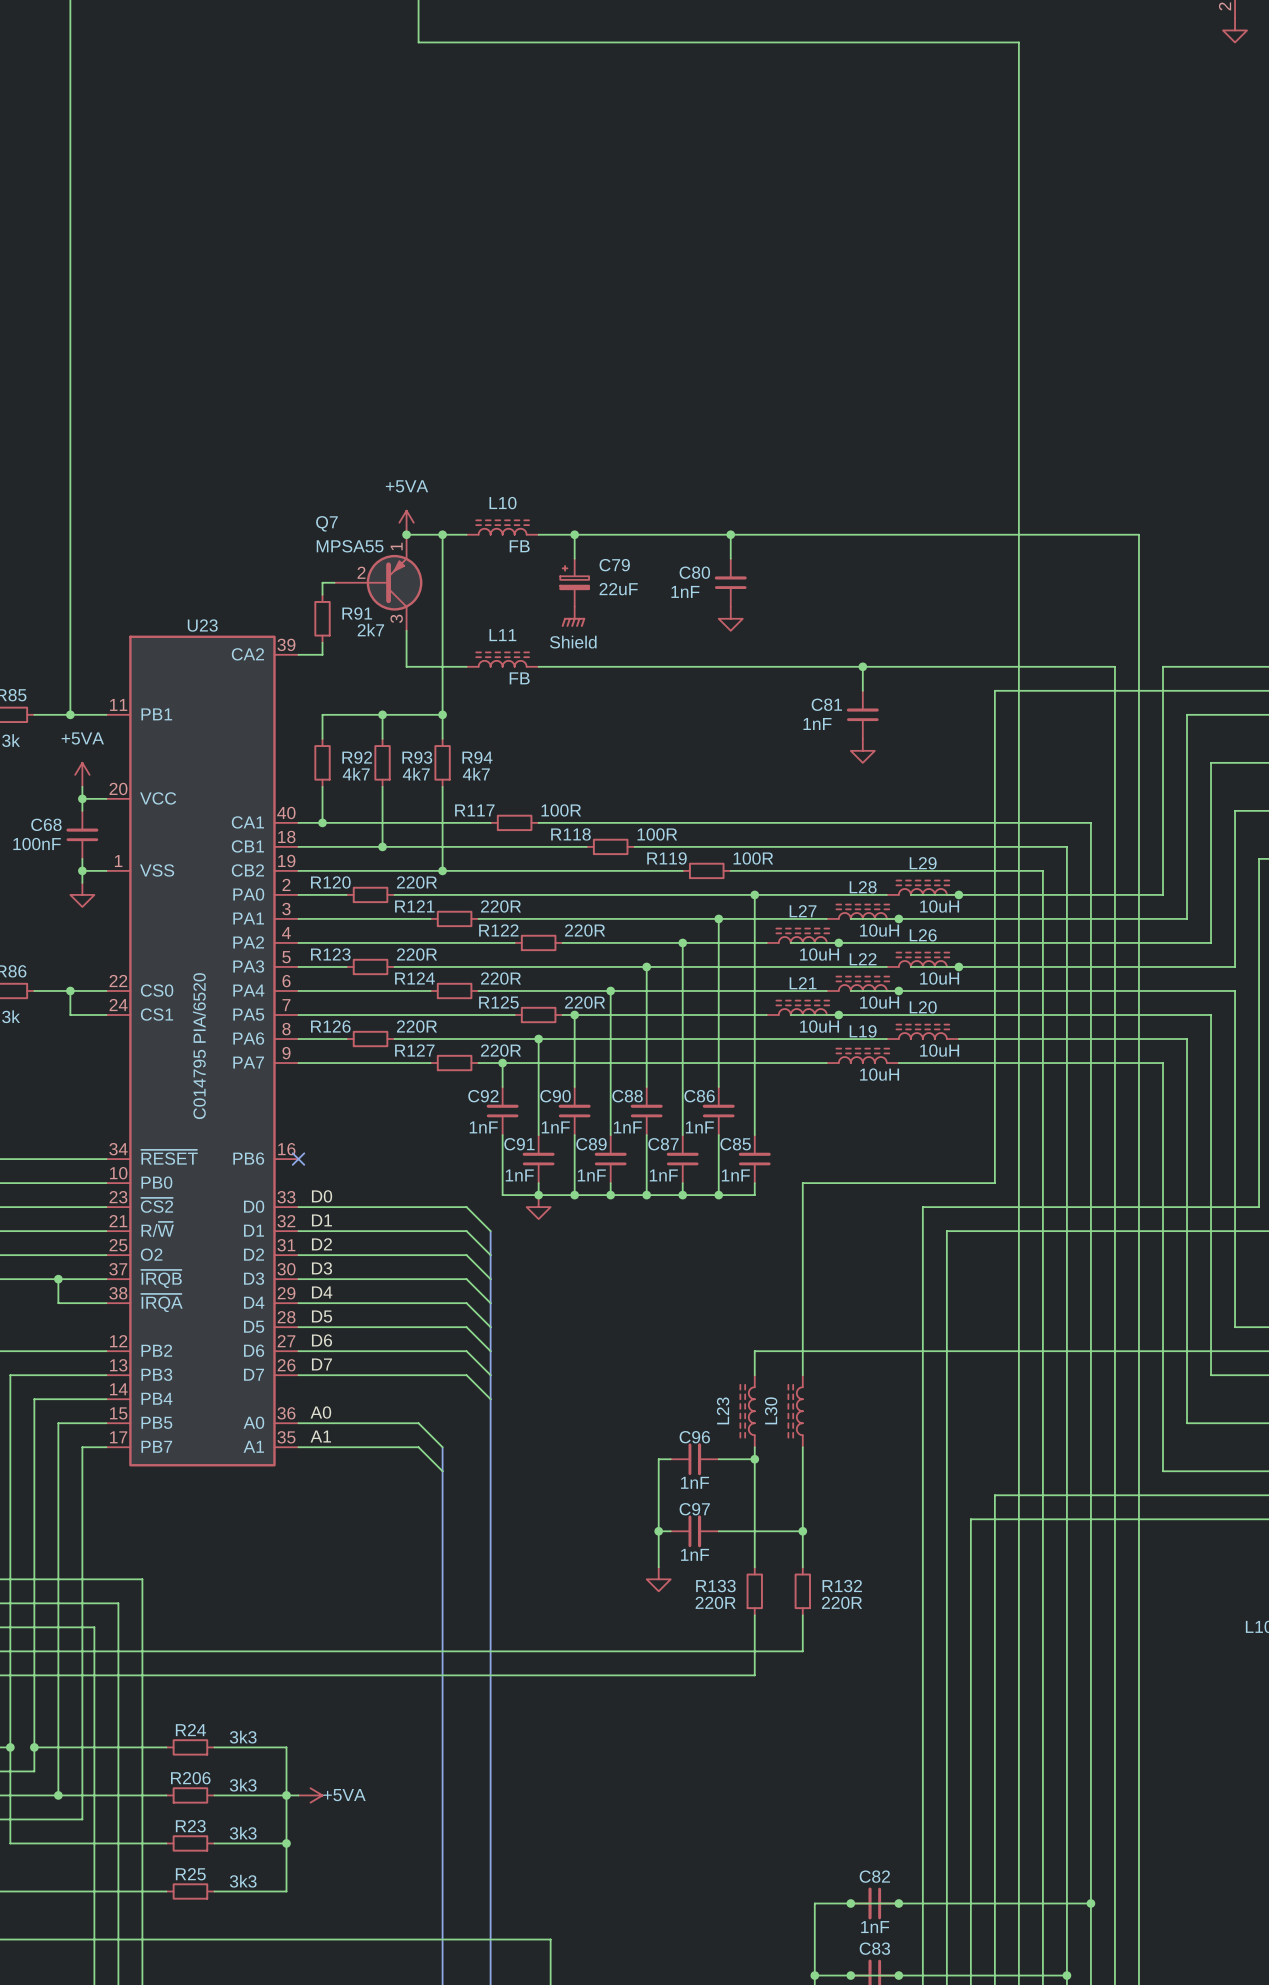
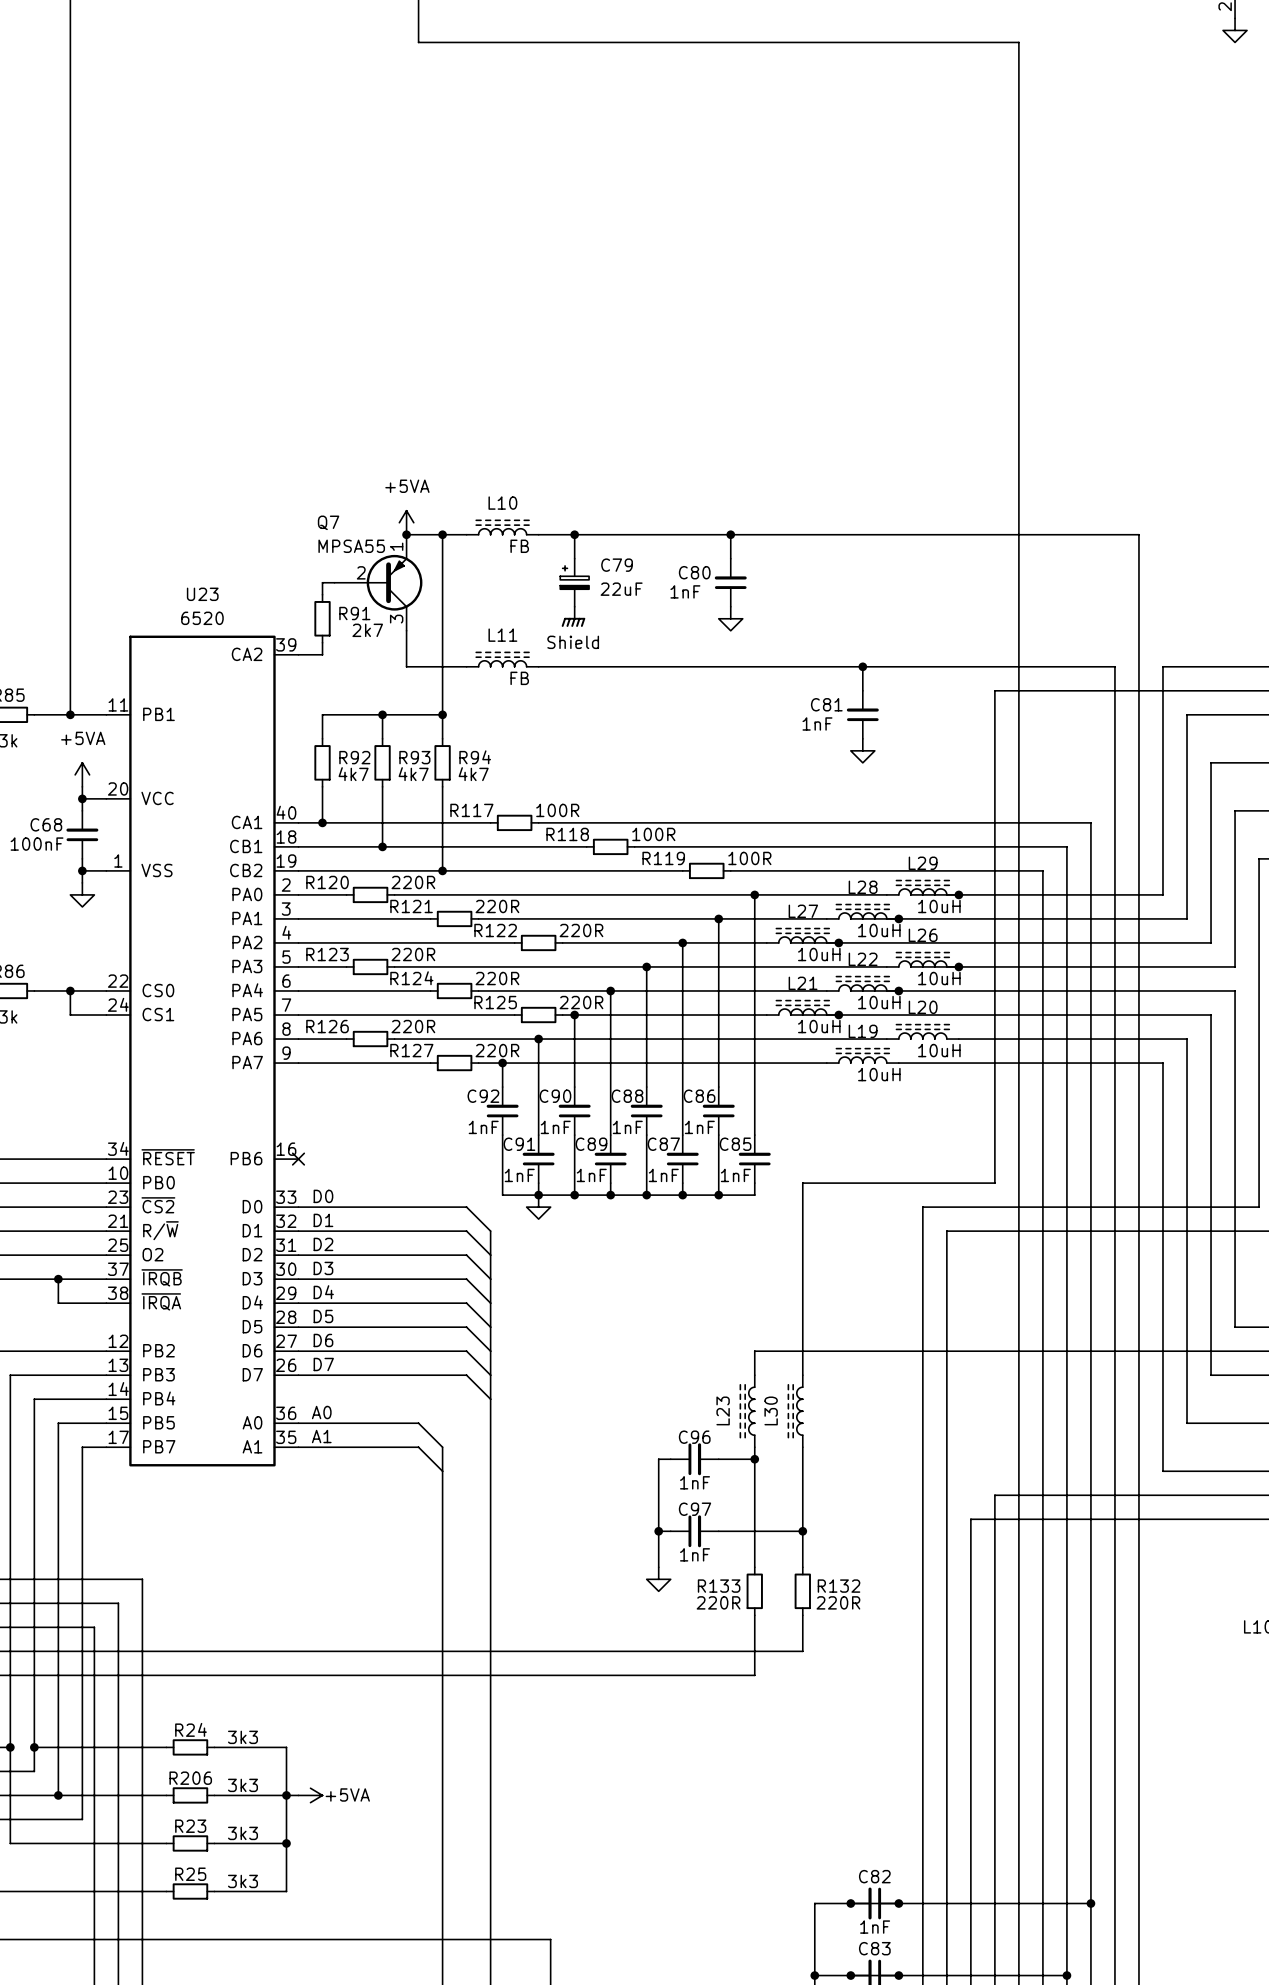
U23 name position: U23 (202, 625) -> U23 (202, 594)
U23 value: C014795 PIA/6520 (199, 1046) -> 6520 (202, 618)

